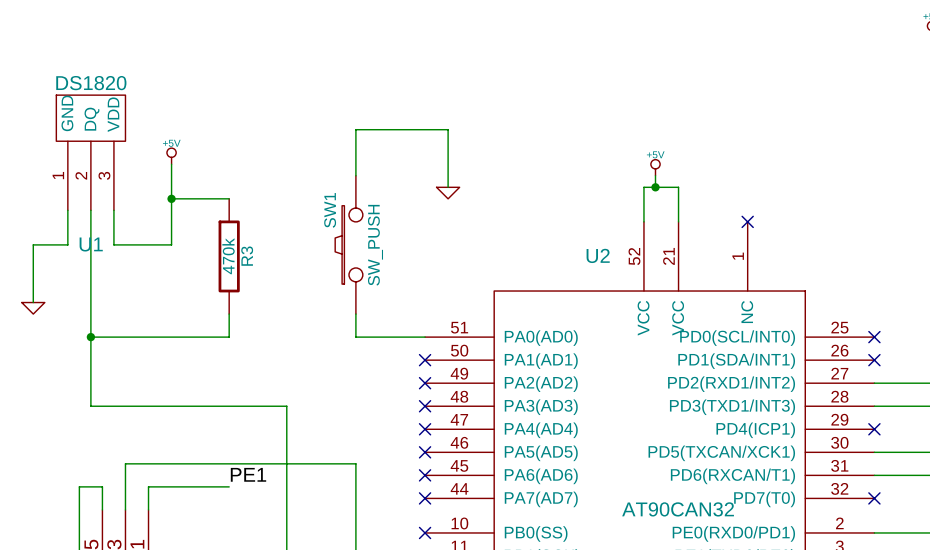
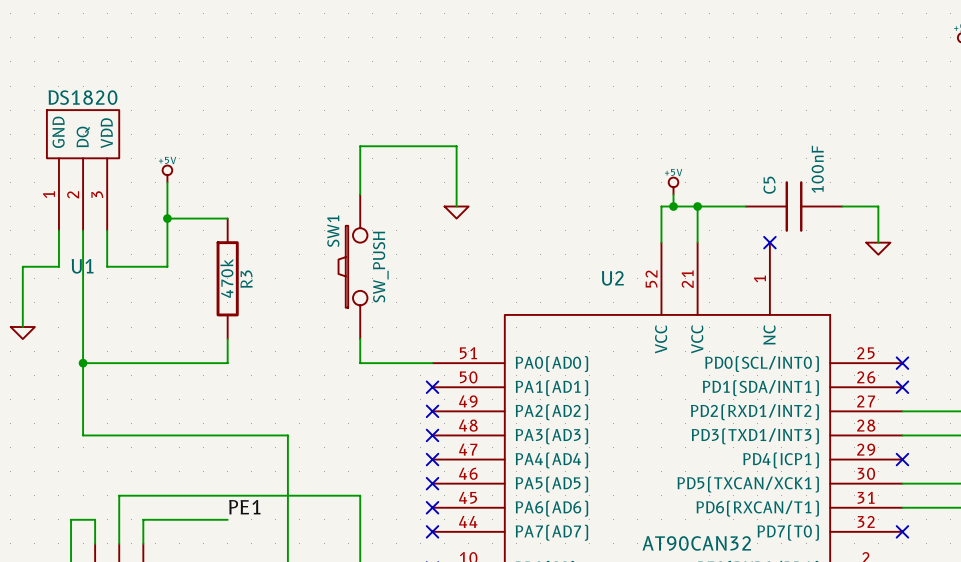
wire: none -> (697, 206) (745, 206)
junction: none -> (697, 206)
C5: none -> 100nF (794, 206)
wire: none -> (842, 206) (878, 206) (878, 242)
power symbol: none -> (878, 248)

